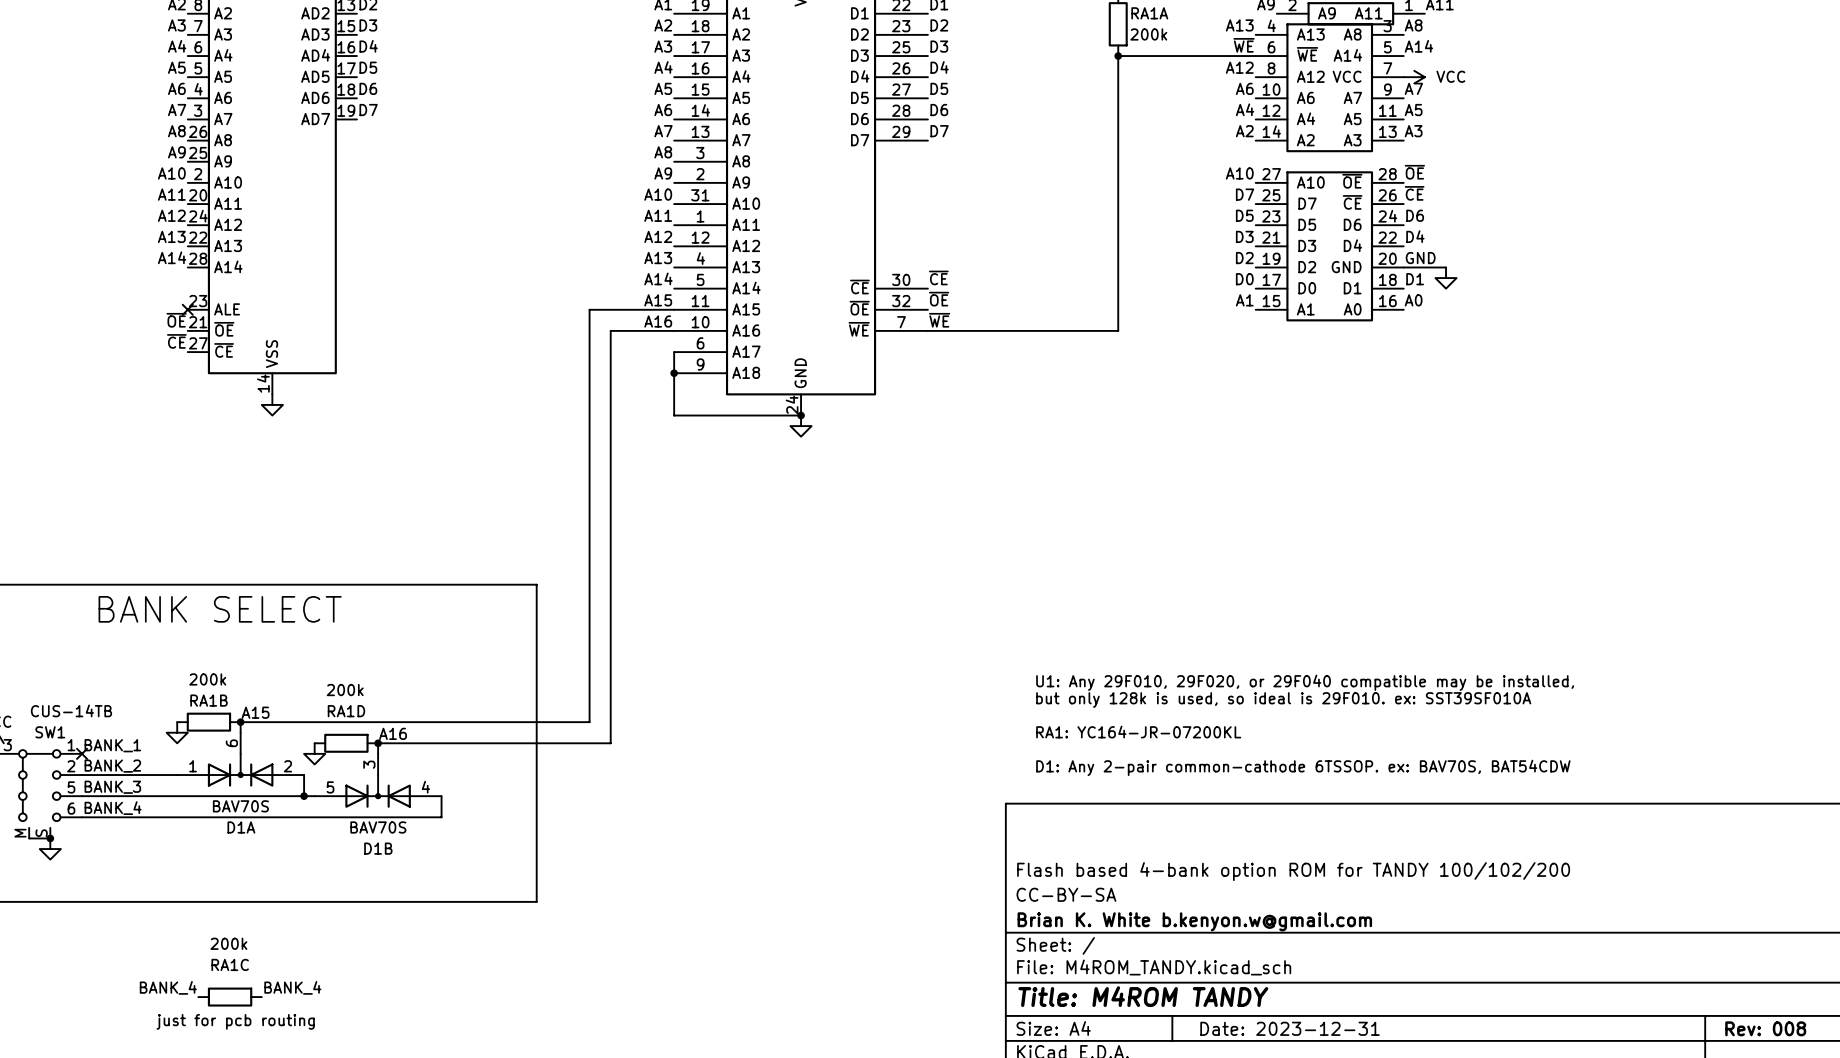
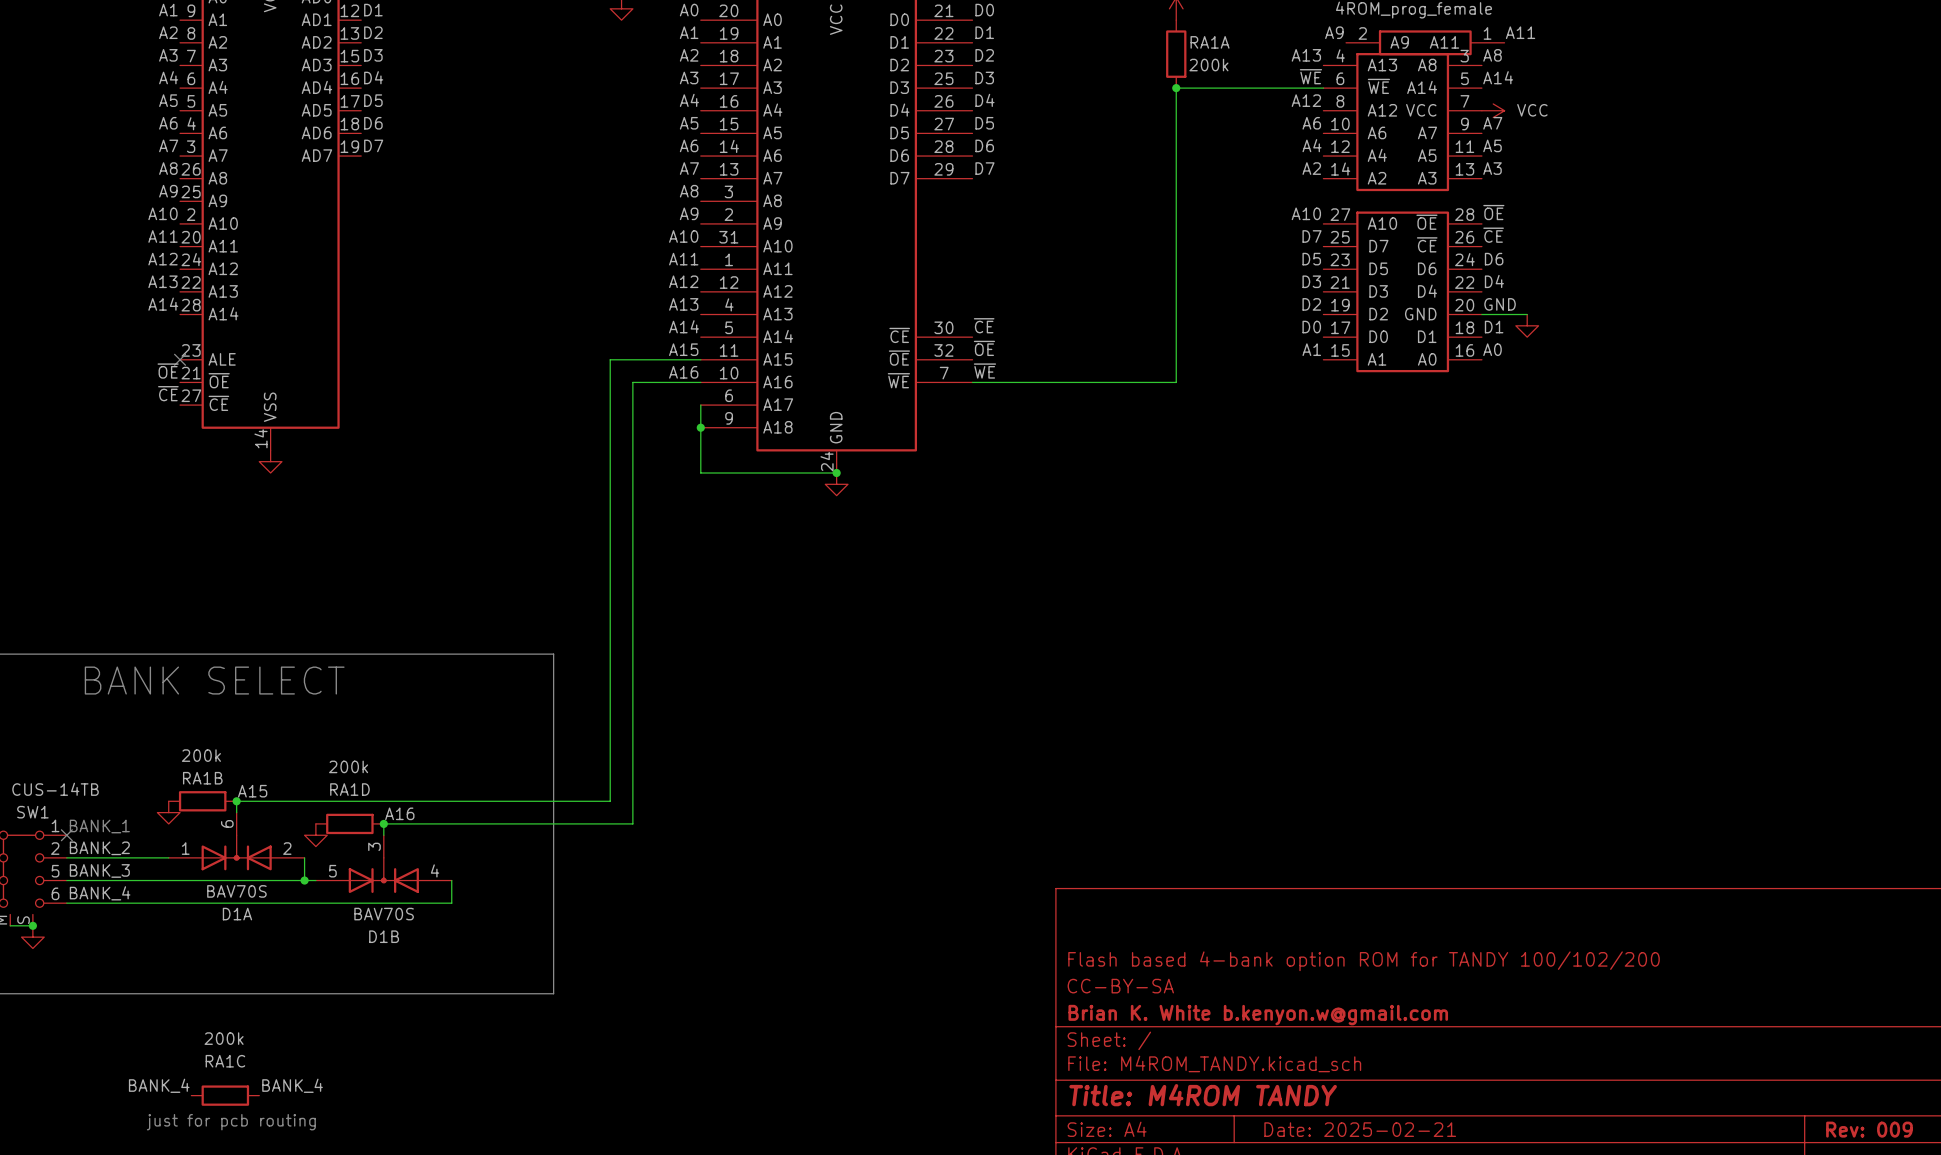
text: U1: Any 29F010, 29F020, or 29F040 compatible may be installed, (1305, 682) -> none
text: but only 128k is used, so ideal is 29F010. ex: SST39SF010A (1283, 700) -> none
text: RA1: YC164-JR-07200KL (1138, 732) -> none
text: D1: Any 2-pair common-cathode 6TSSOP. ex: BAV70S, BAT54CDW (1303, 767) -> none
title block: Date: 2023-12-31 (1290, 1028) -> Date: 2025-02-21 (1360, 1129)
title block: Rev: 008 (1765, 1028) -> Rev: 009 (1869, 1129)

